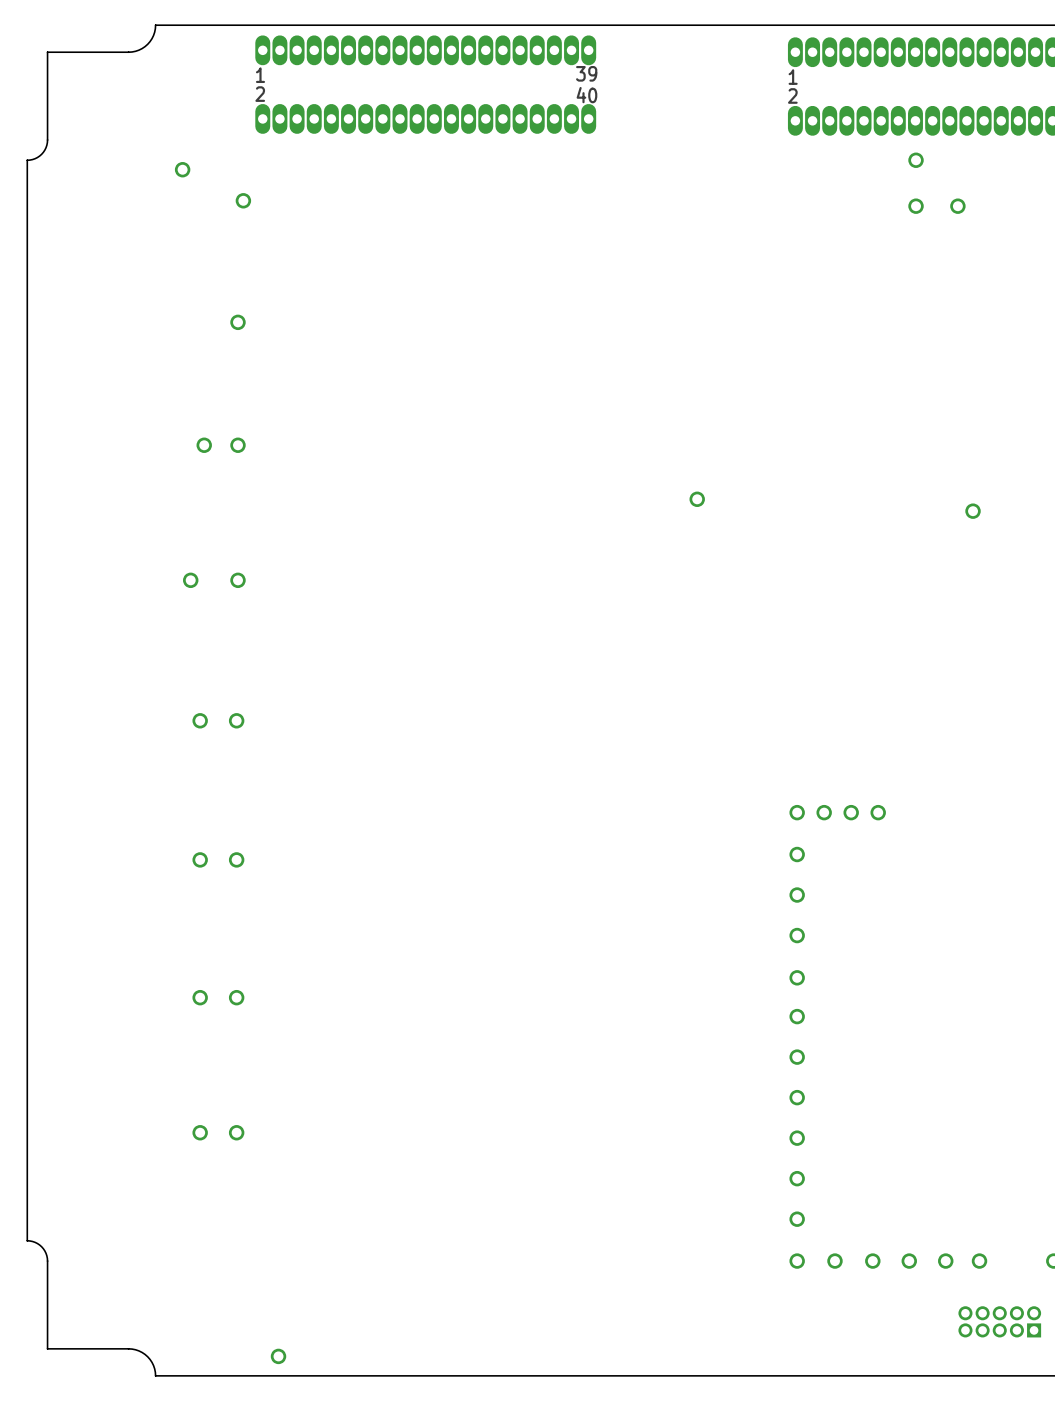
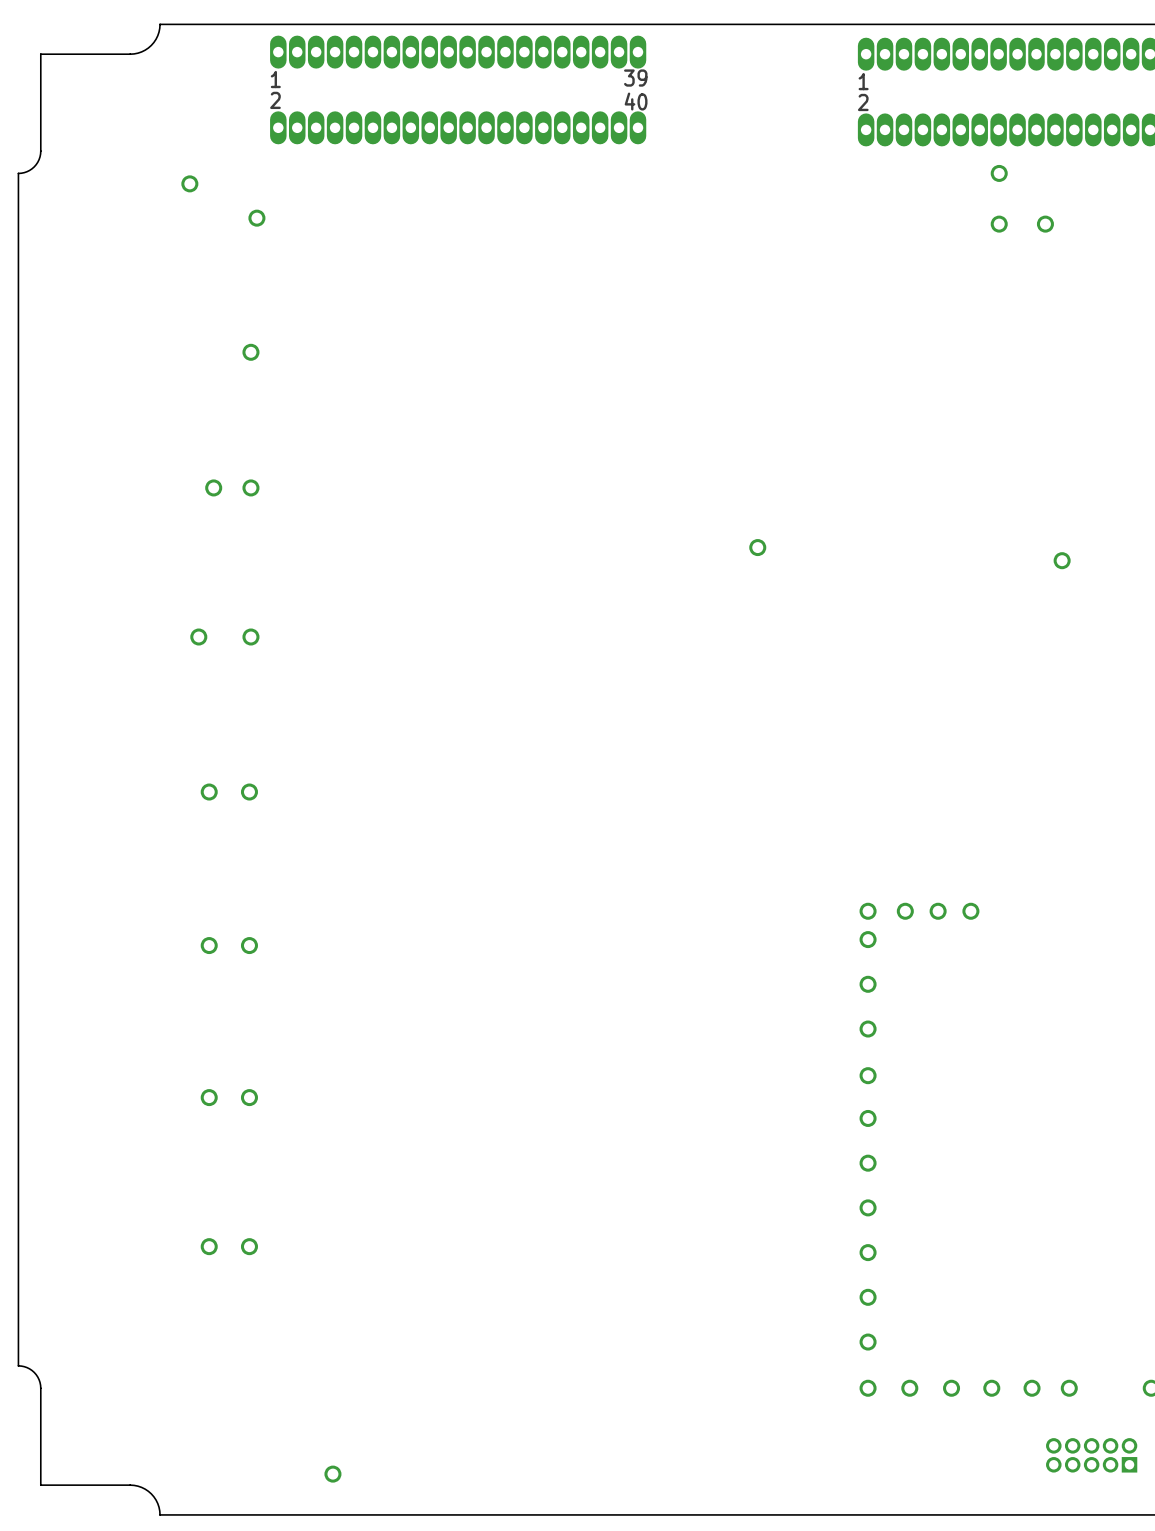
part: (797, 812) -> none
part: (824, 812) -> none
part: (851, 812) -> none
part: (878, 812) -> none
part: none -> (868, 911)
part: none -> (905, 911)
part: none -> (938, 911)
part: none -> (970, 911)
part position: (278, 1356) -> (332, 1474)

